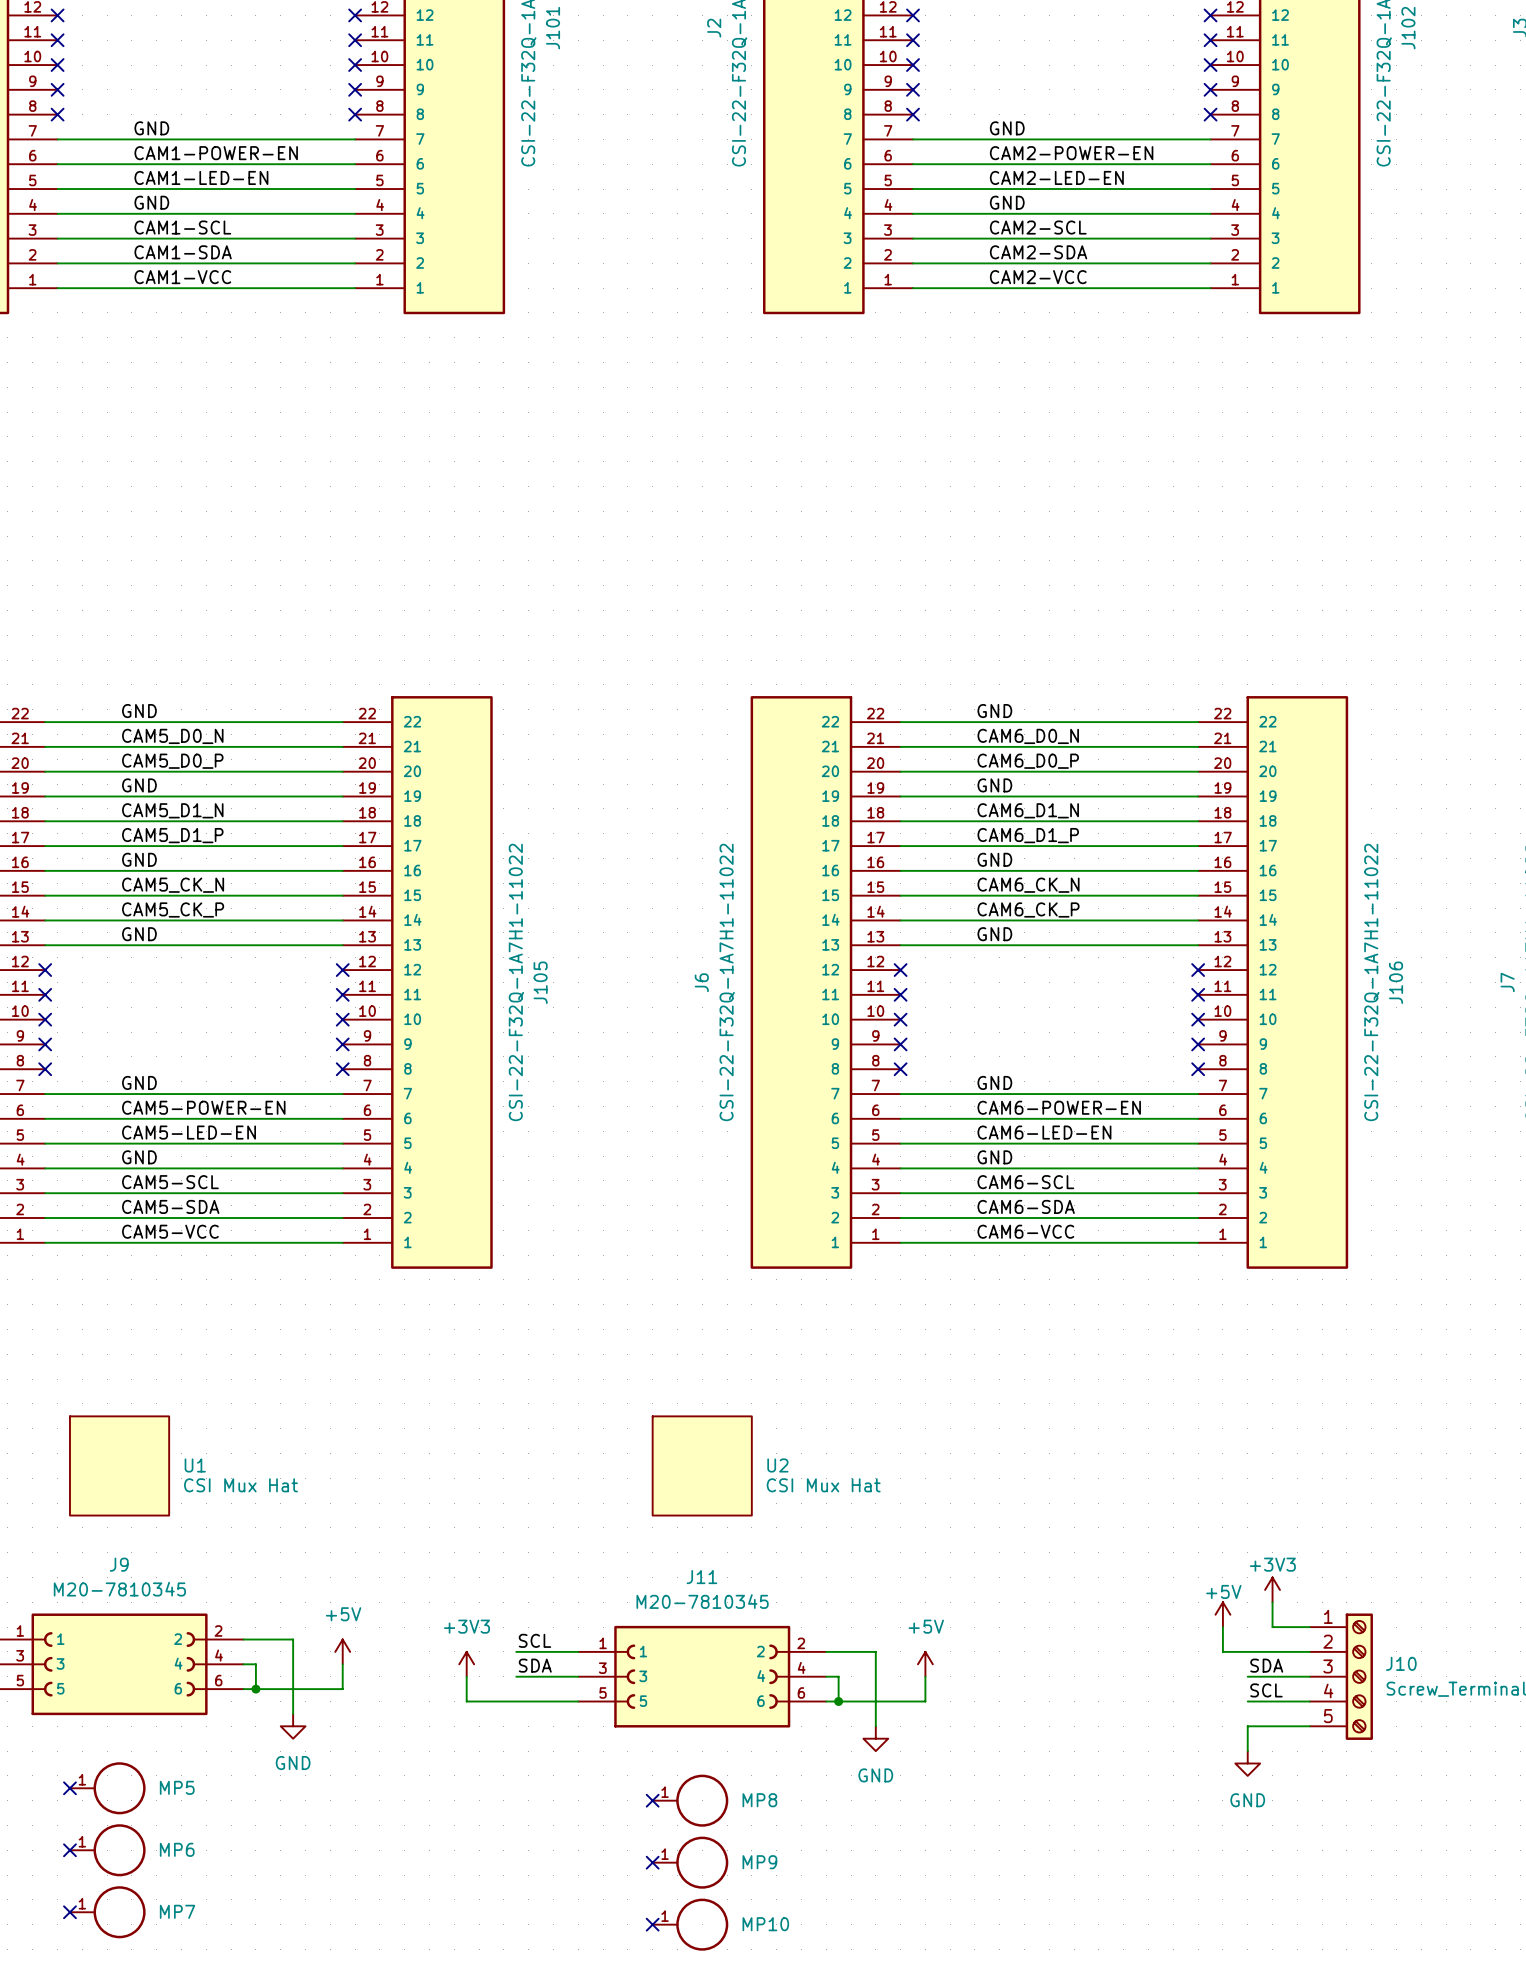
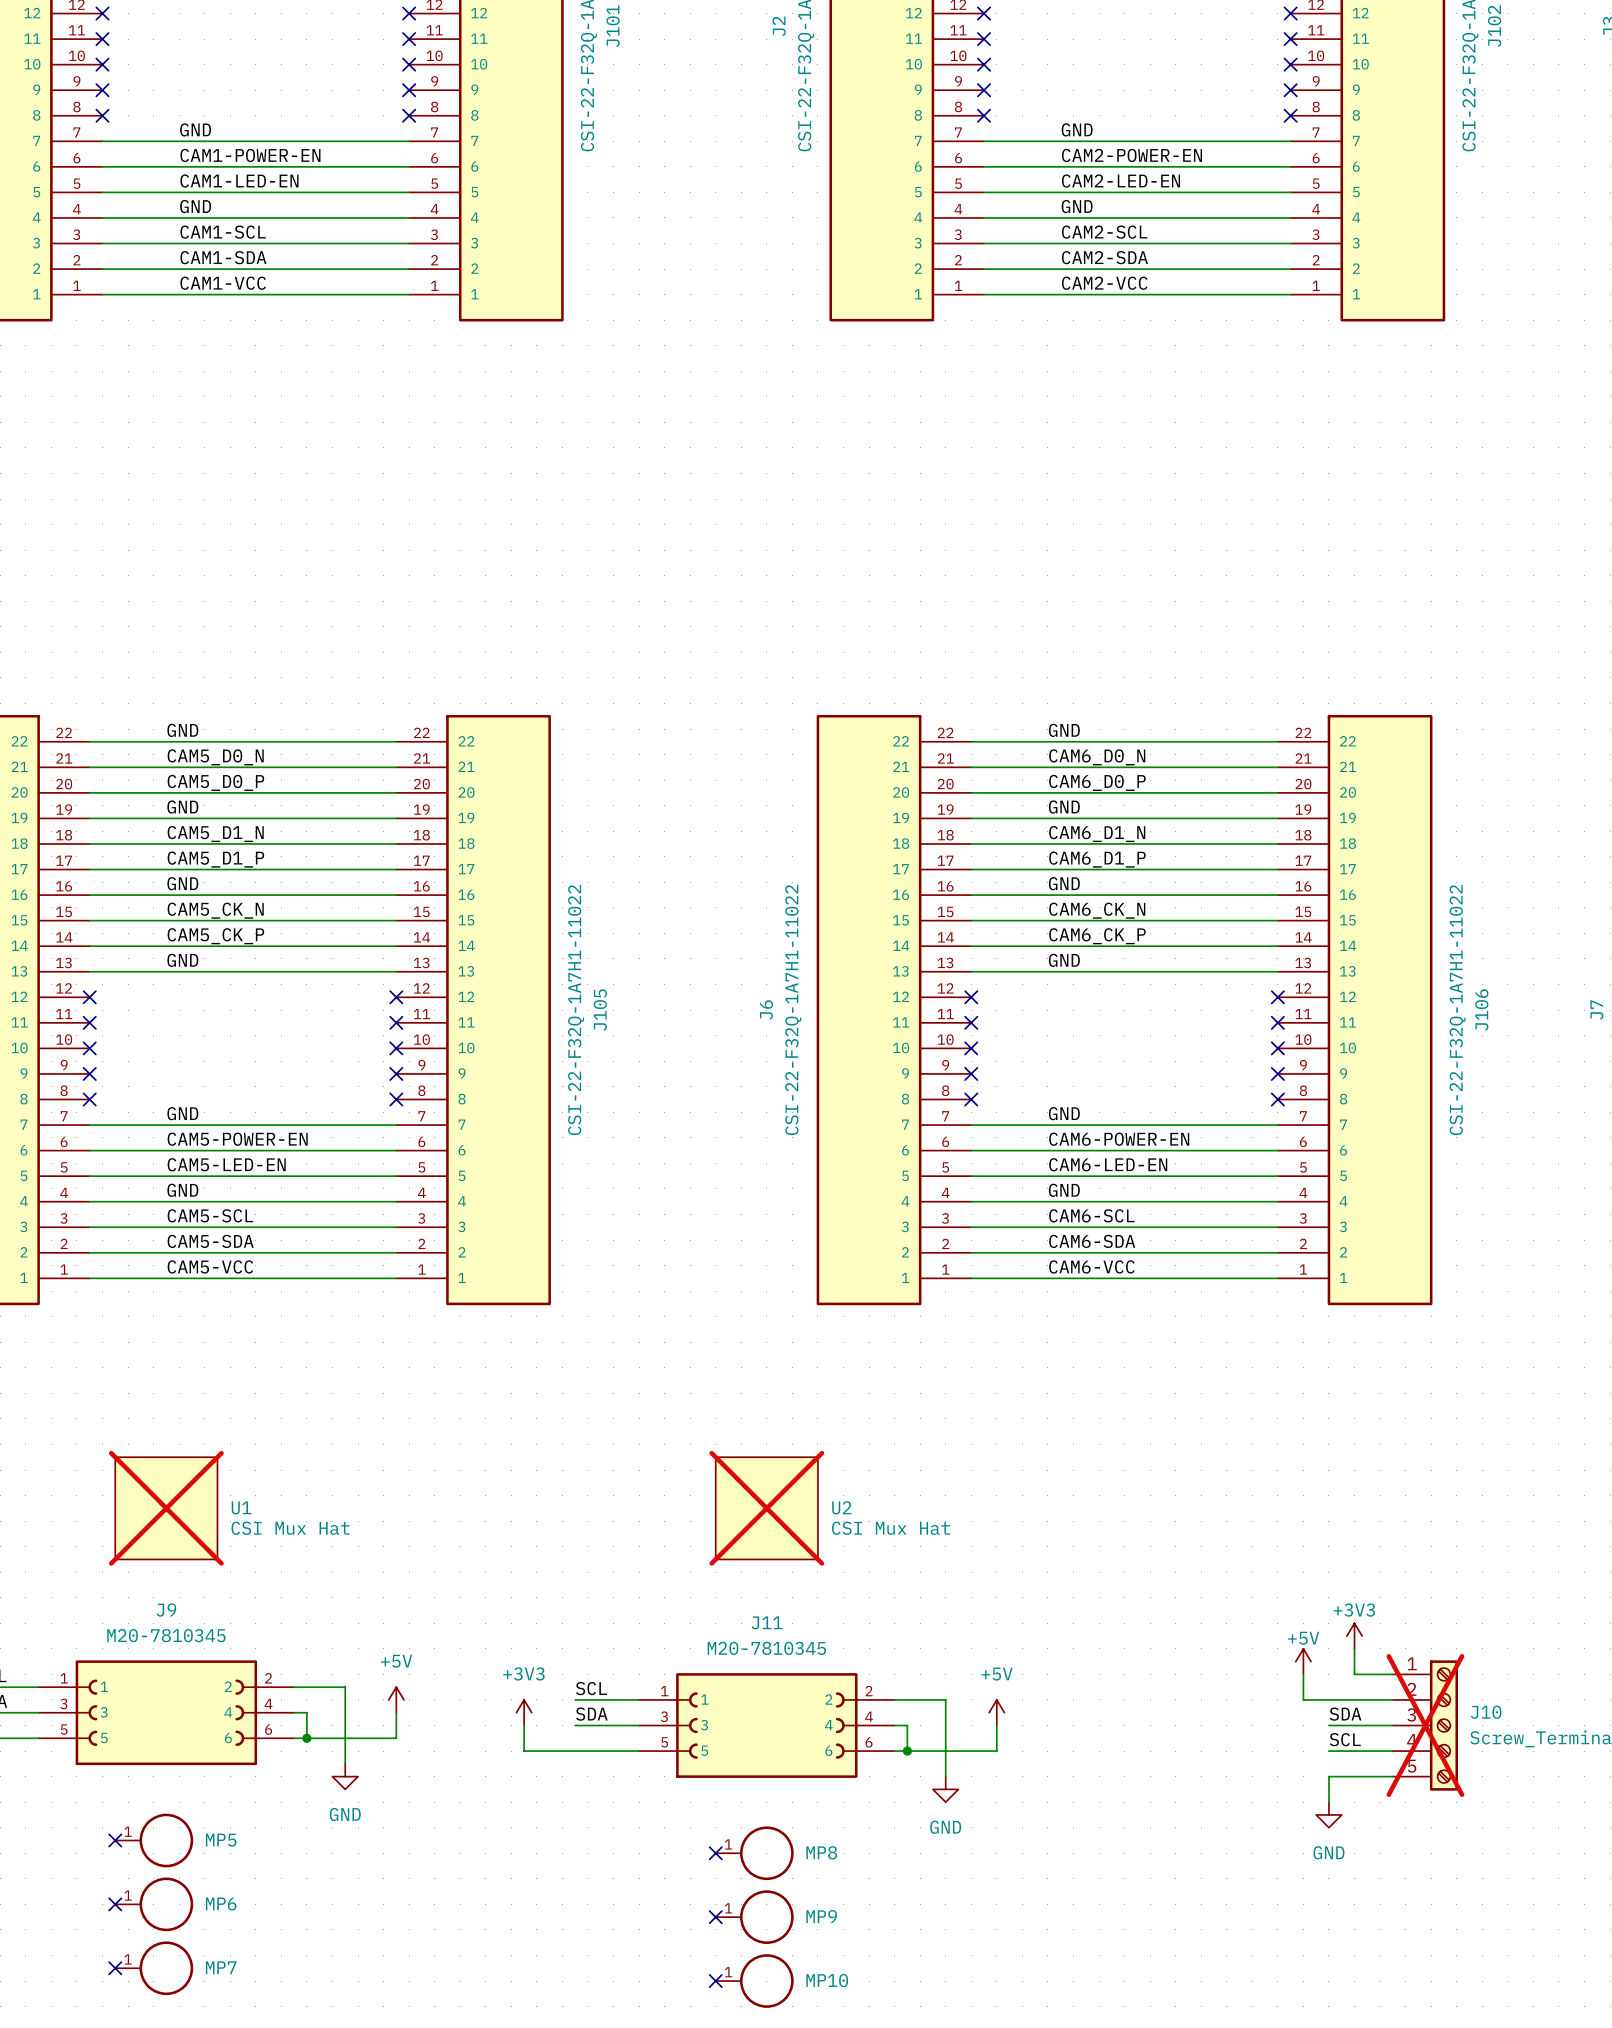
U1 do-not-place cross: none -> (166, 1508)
U2 do-not-place cross: none -> (766, 1508)
J10 do-not-place cross: none -> (1425, 1725)

